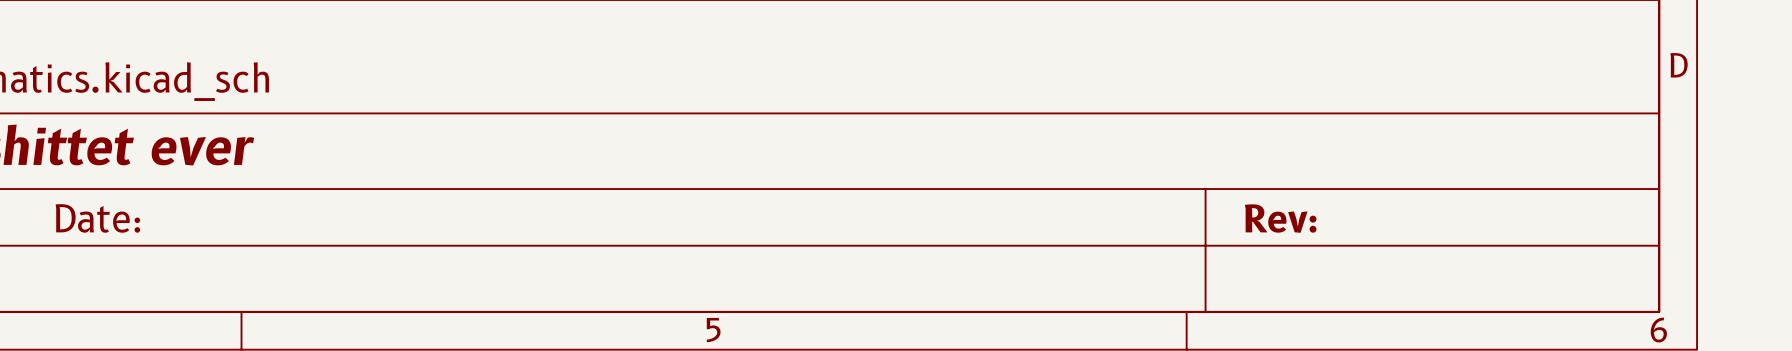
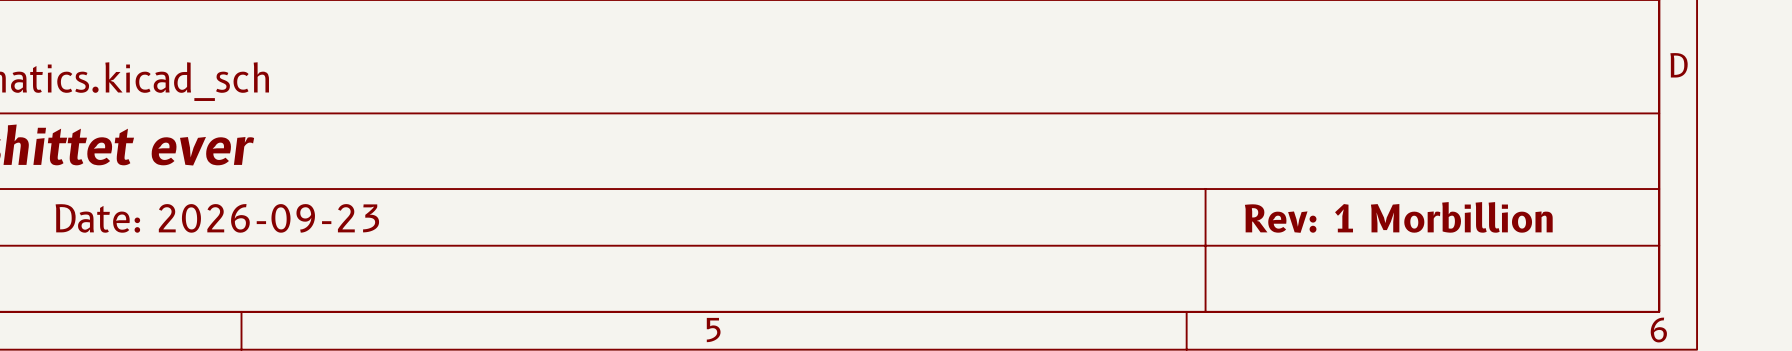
title block: Date: (97, 218) -> Date: 2026-09-23 (217, 218)
title block: Rev: (1280, 218) -> Rev: 1 Morbillion (1398, 217)

